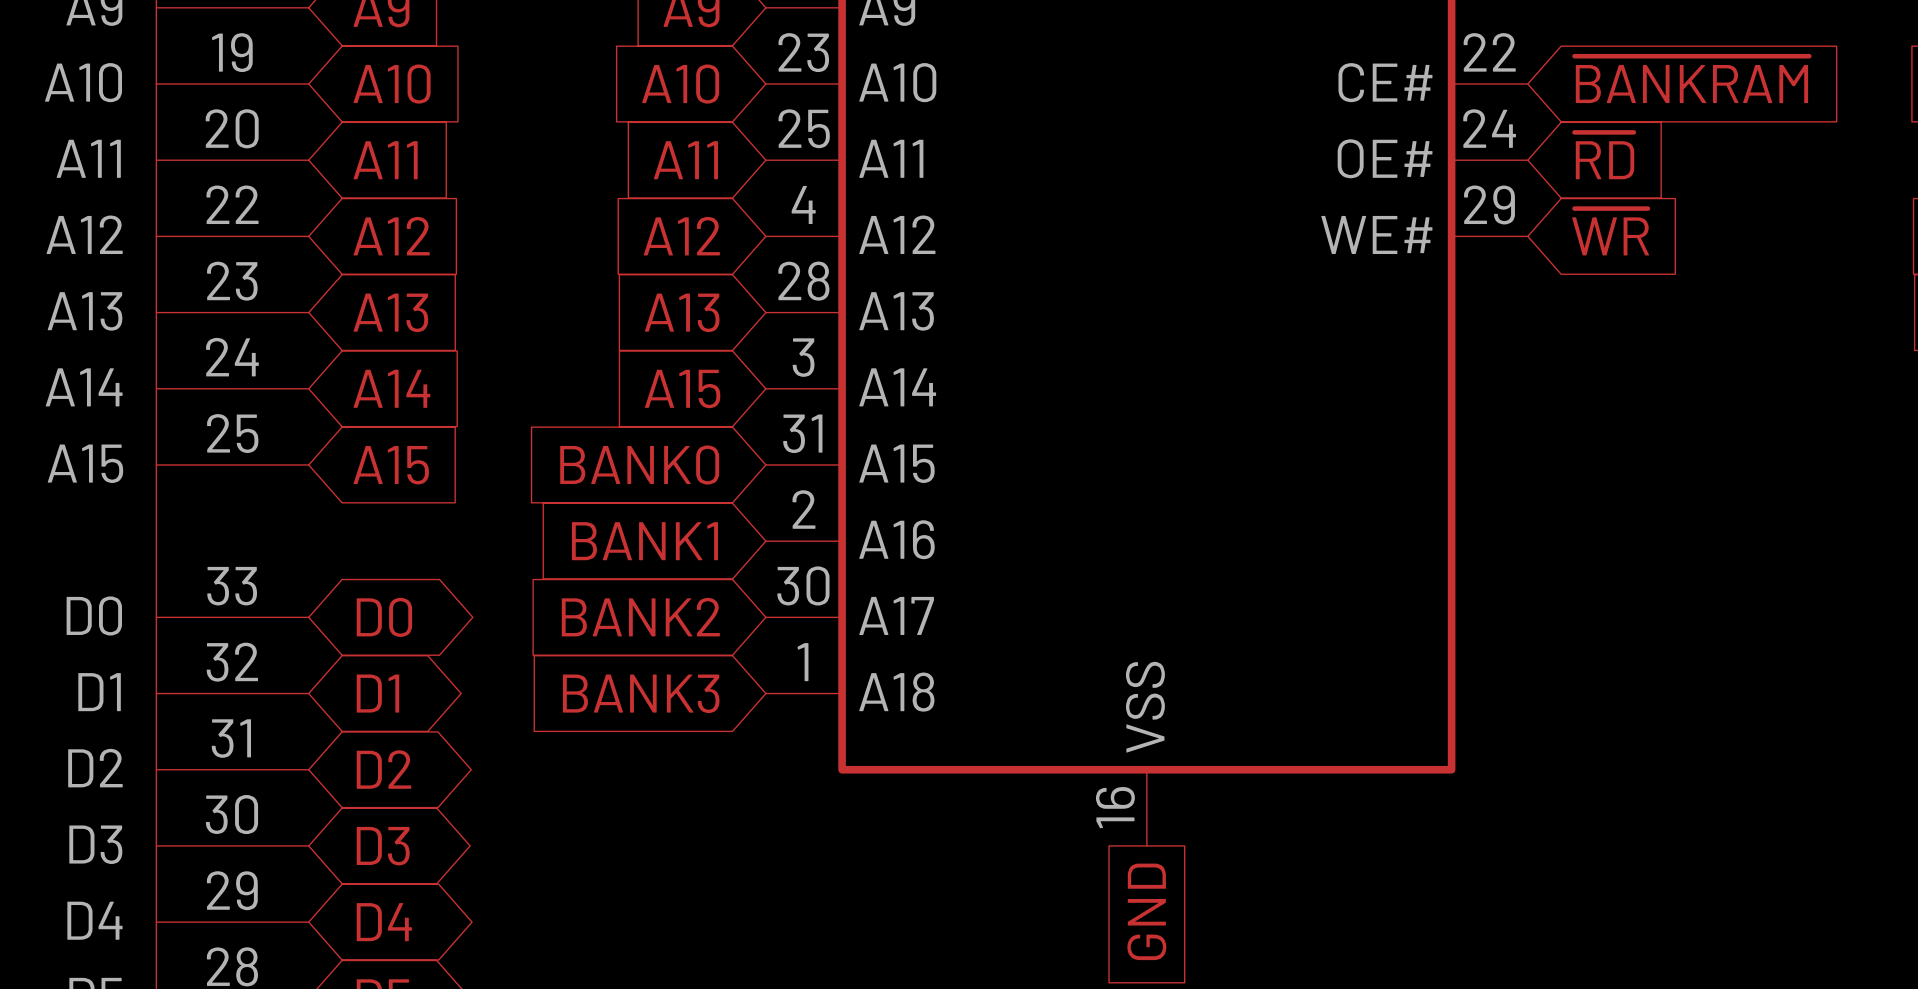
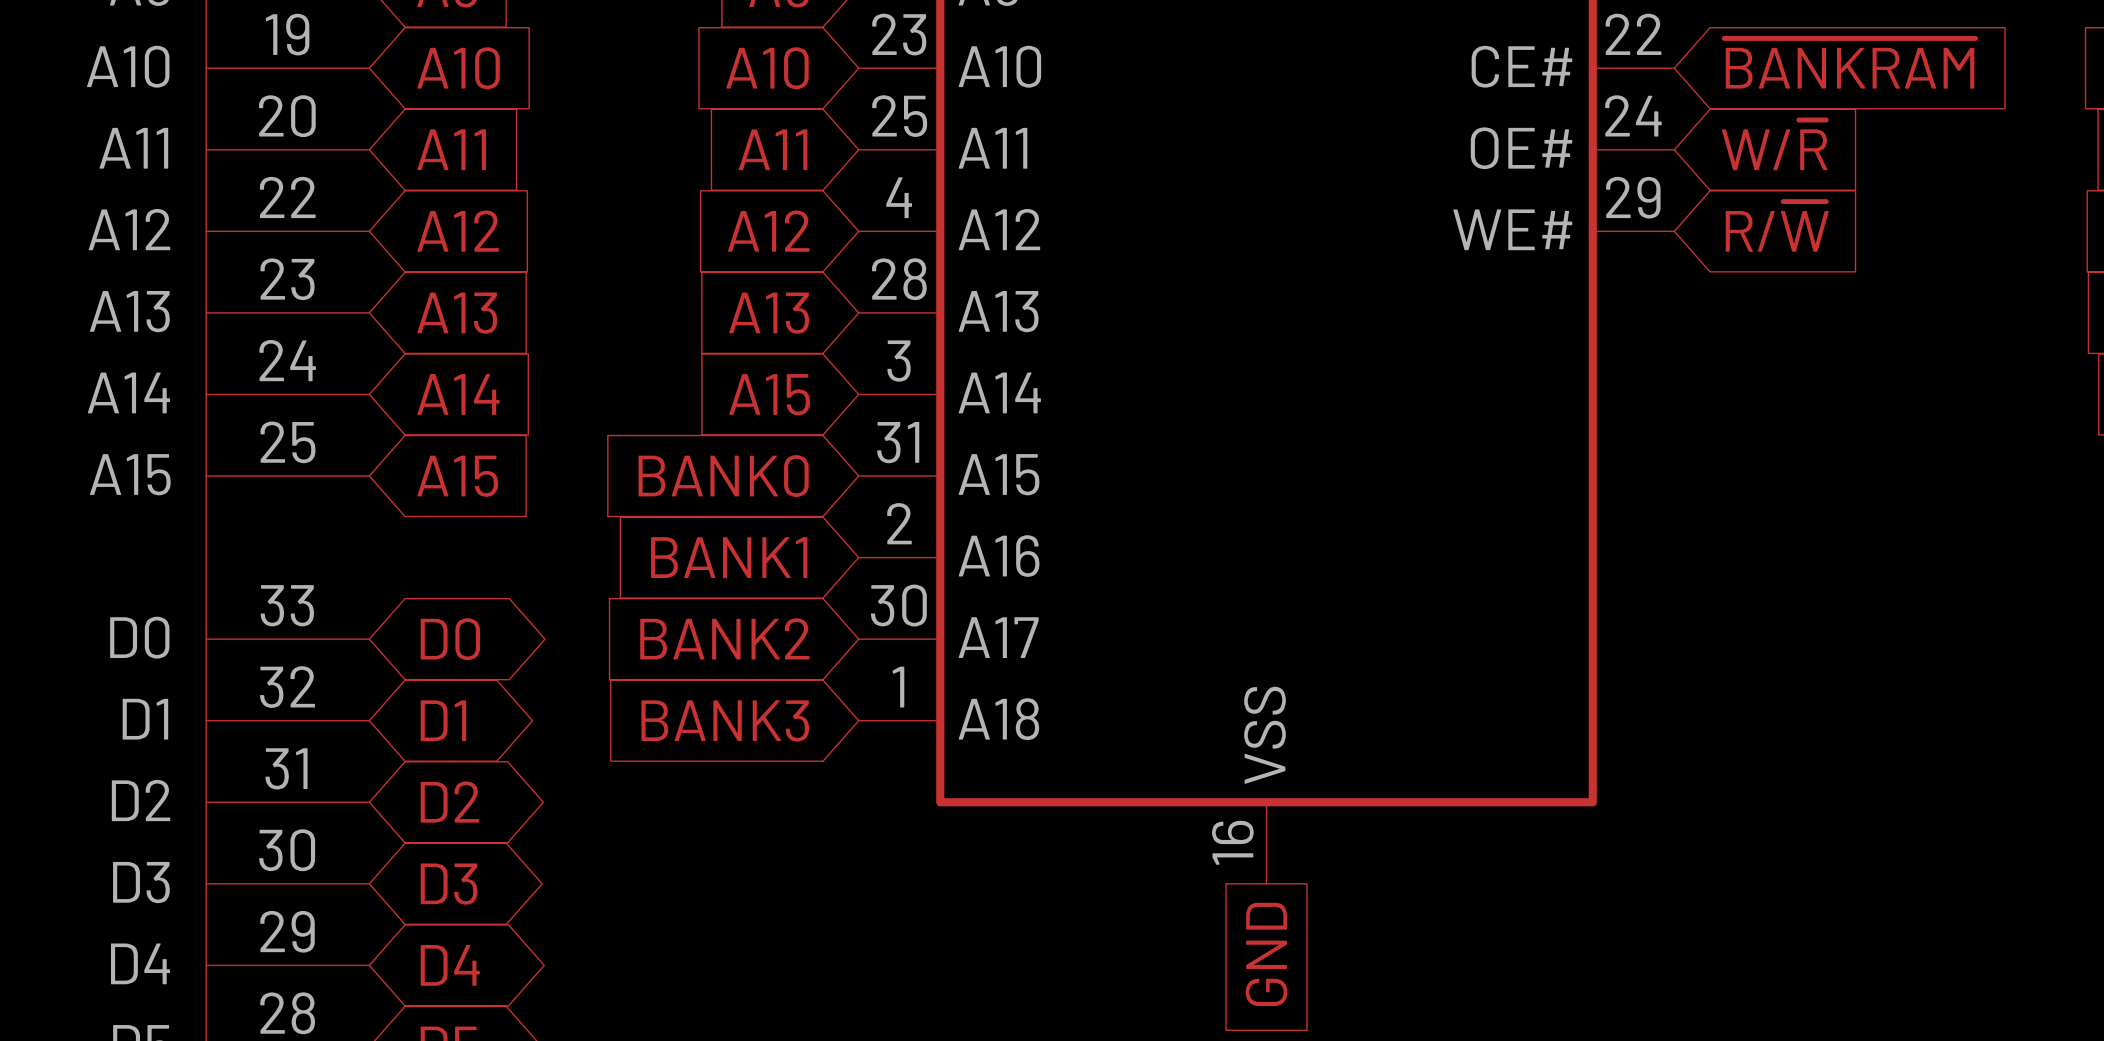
global label: ~{RD} (1604, 155) -> W/~{R} (1774, 145)
global label: ~{WR} (1610, 232) -> R/~{W} (1777, 226)

